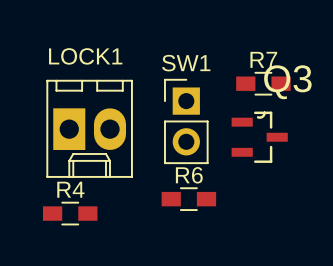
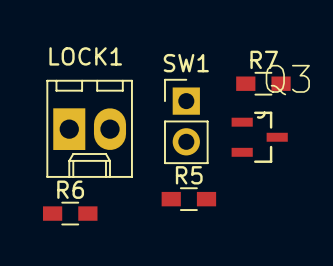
R6 name: R6 (189, 175) -> R5 (189, 175)
R4 name: R4 (70, 189) -> R6 (70, 189)

